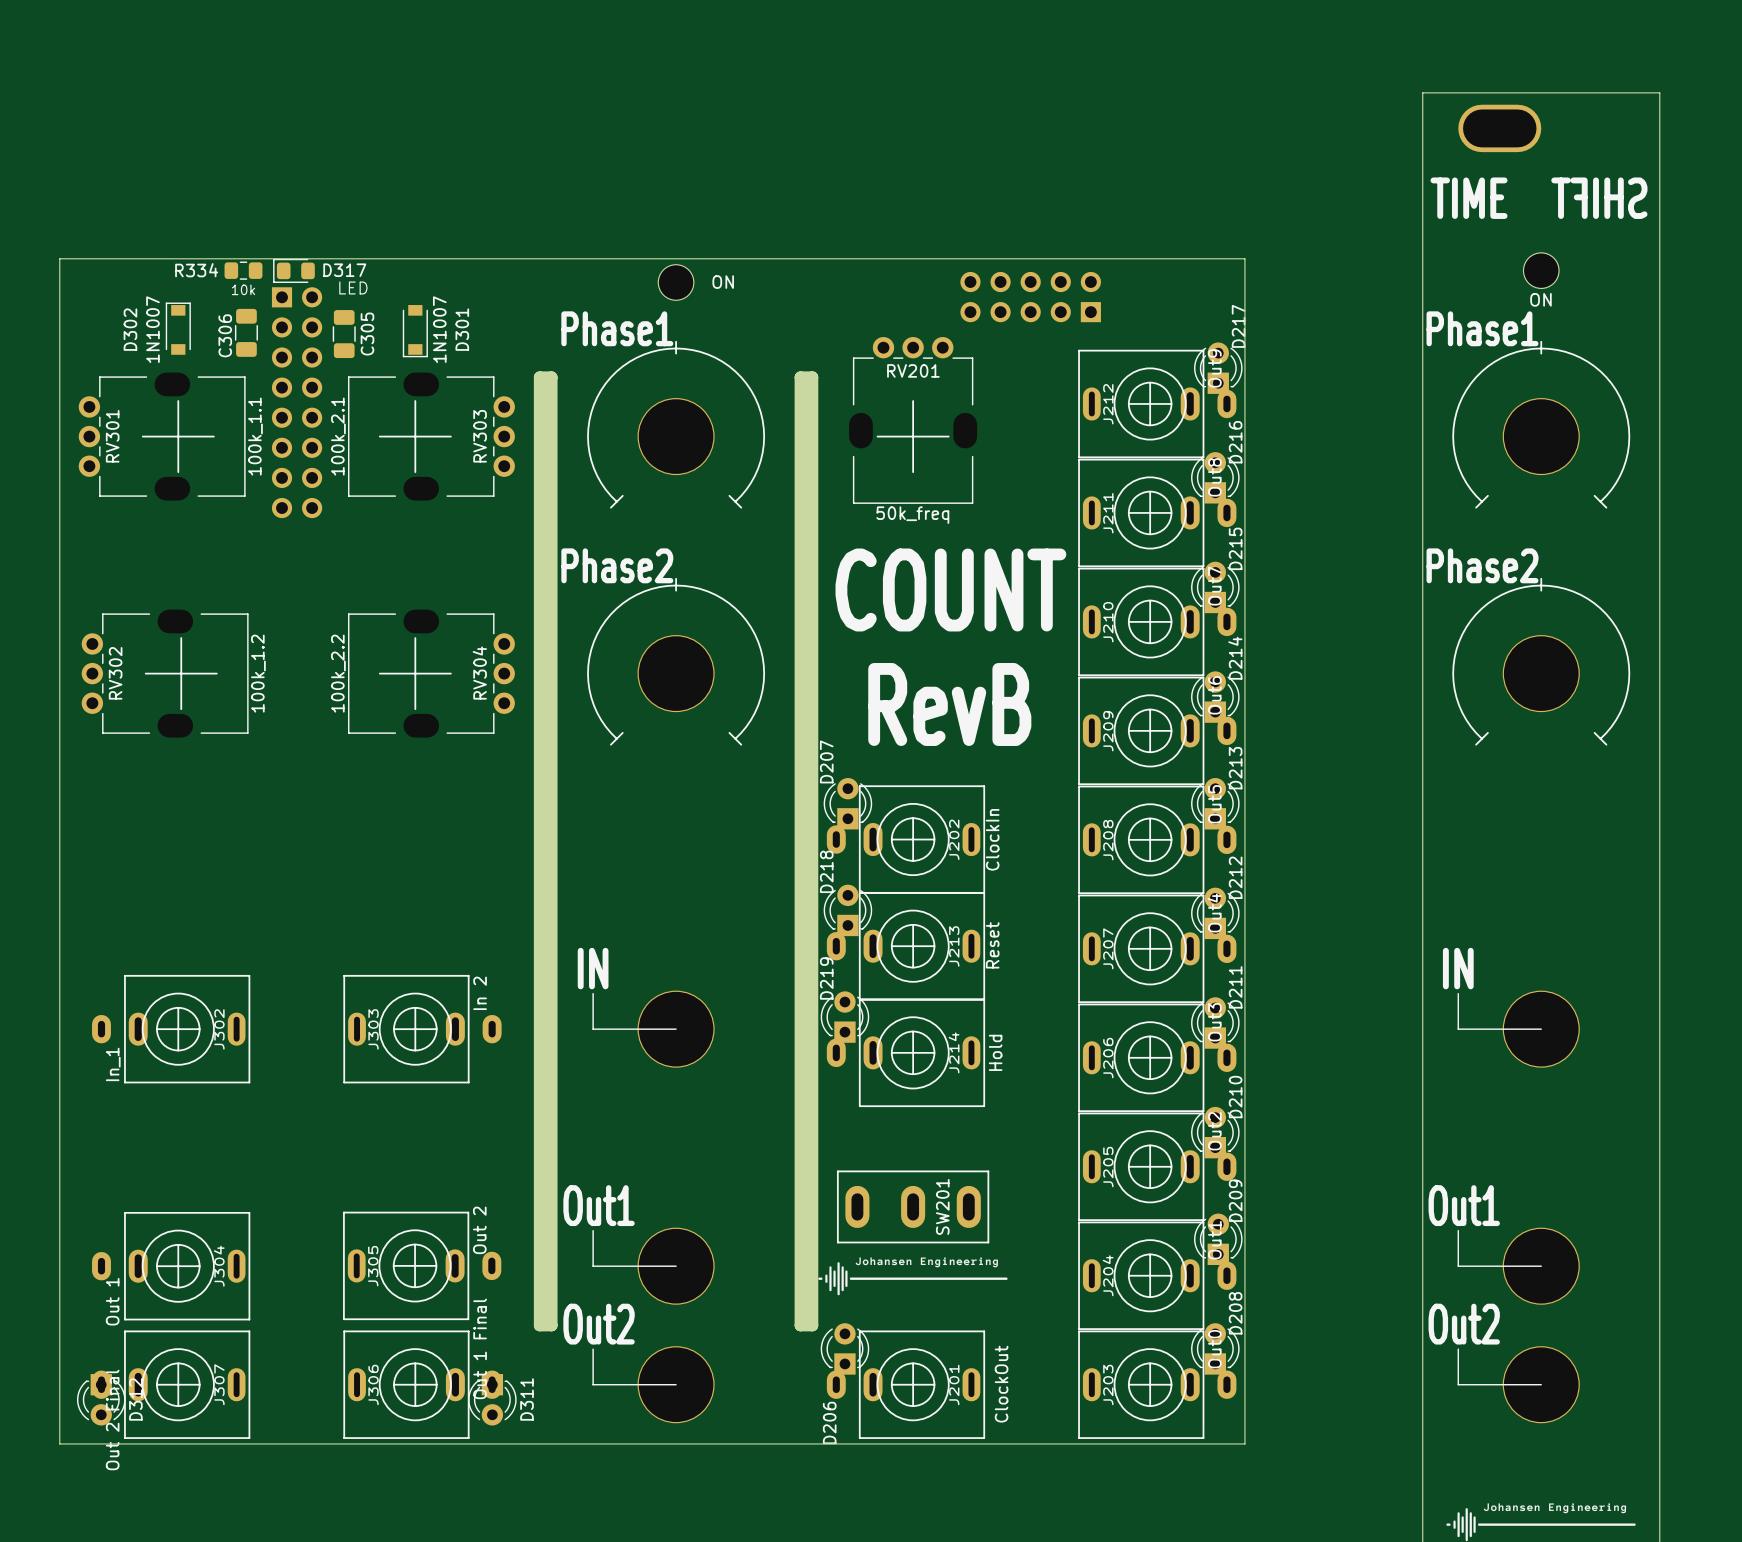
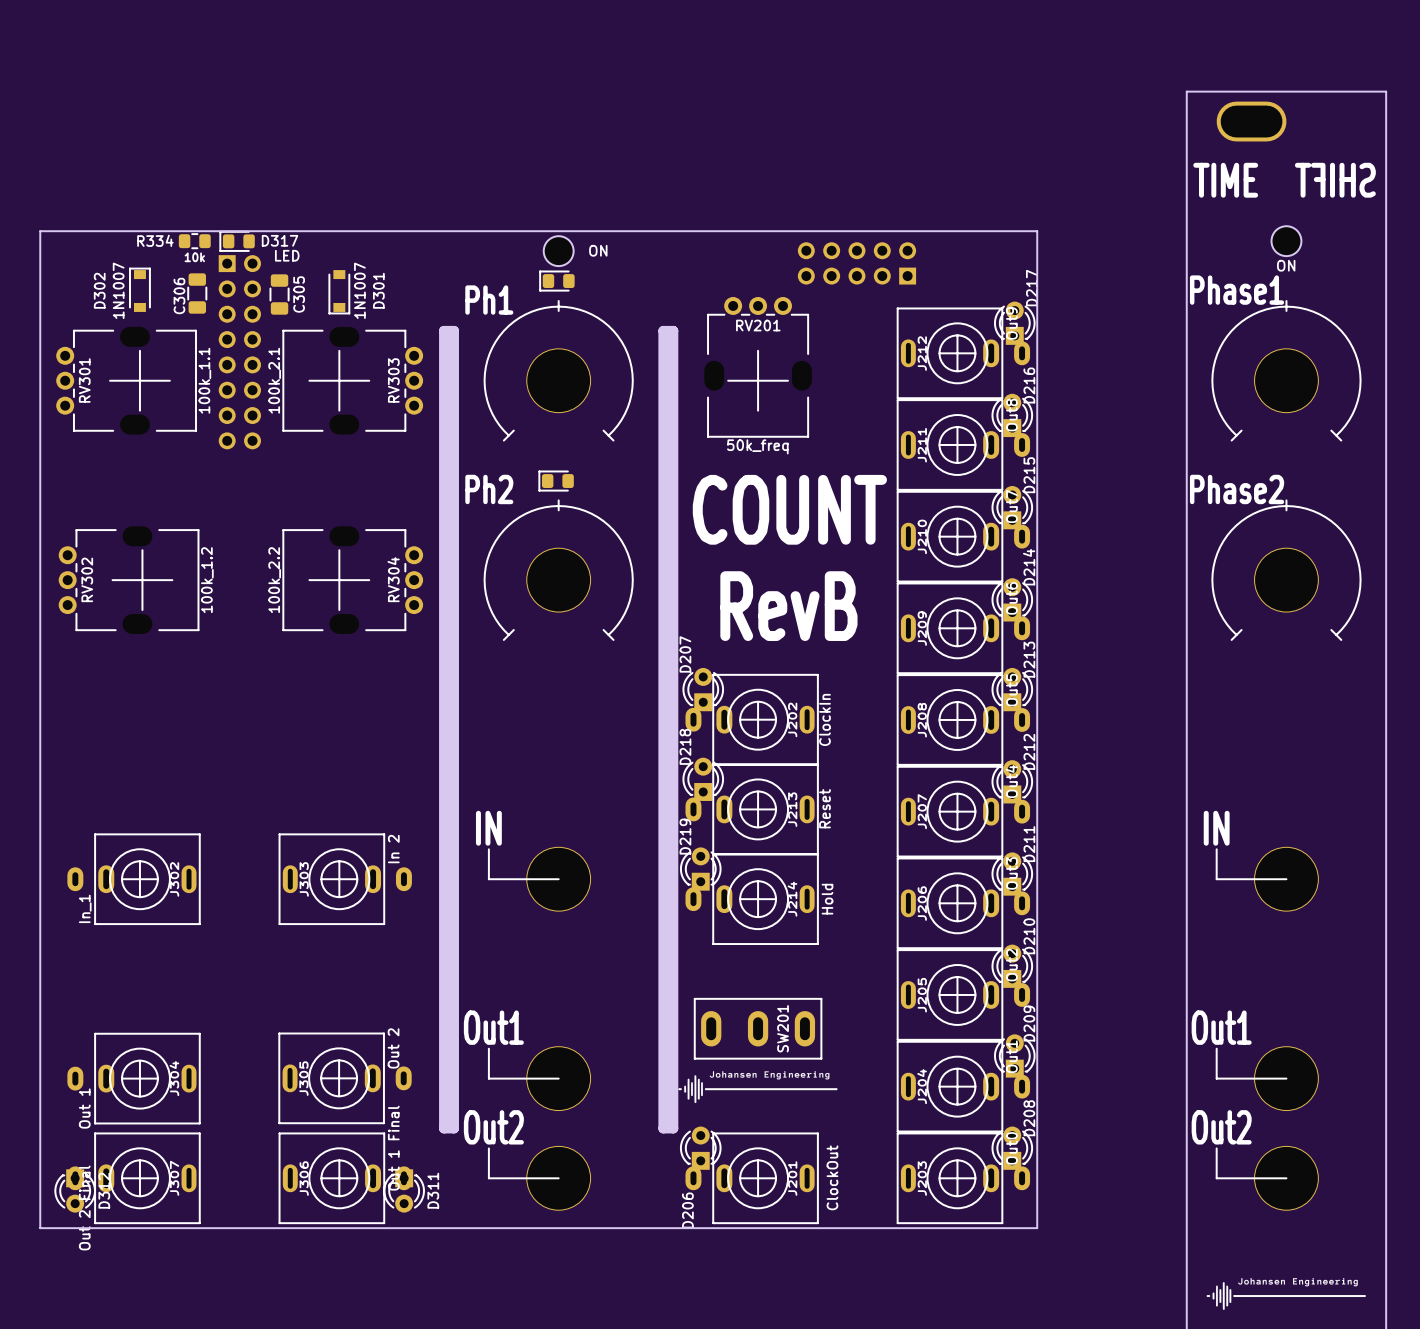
part: none -> (557, 281)
text: Phase1 (617, 328) -> Ph1 (489, 300)
part: none -> (556, 481)
text: Phase2 (617, 565) -> Ph2 (489, 489)

